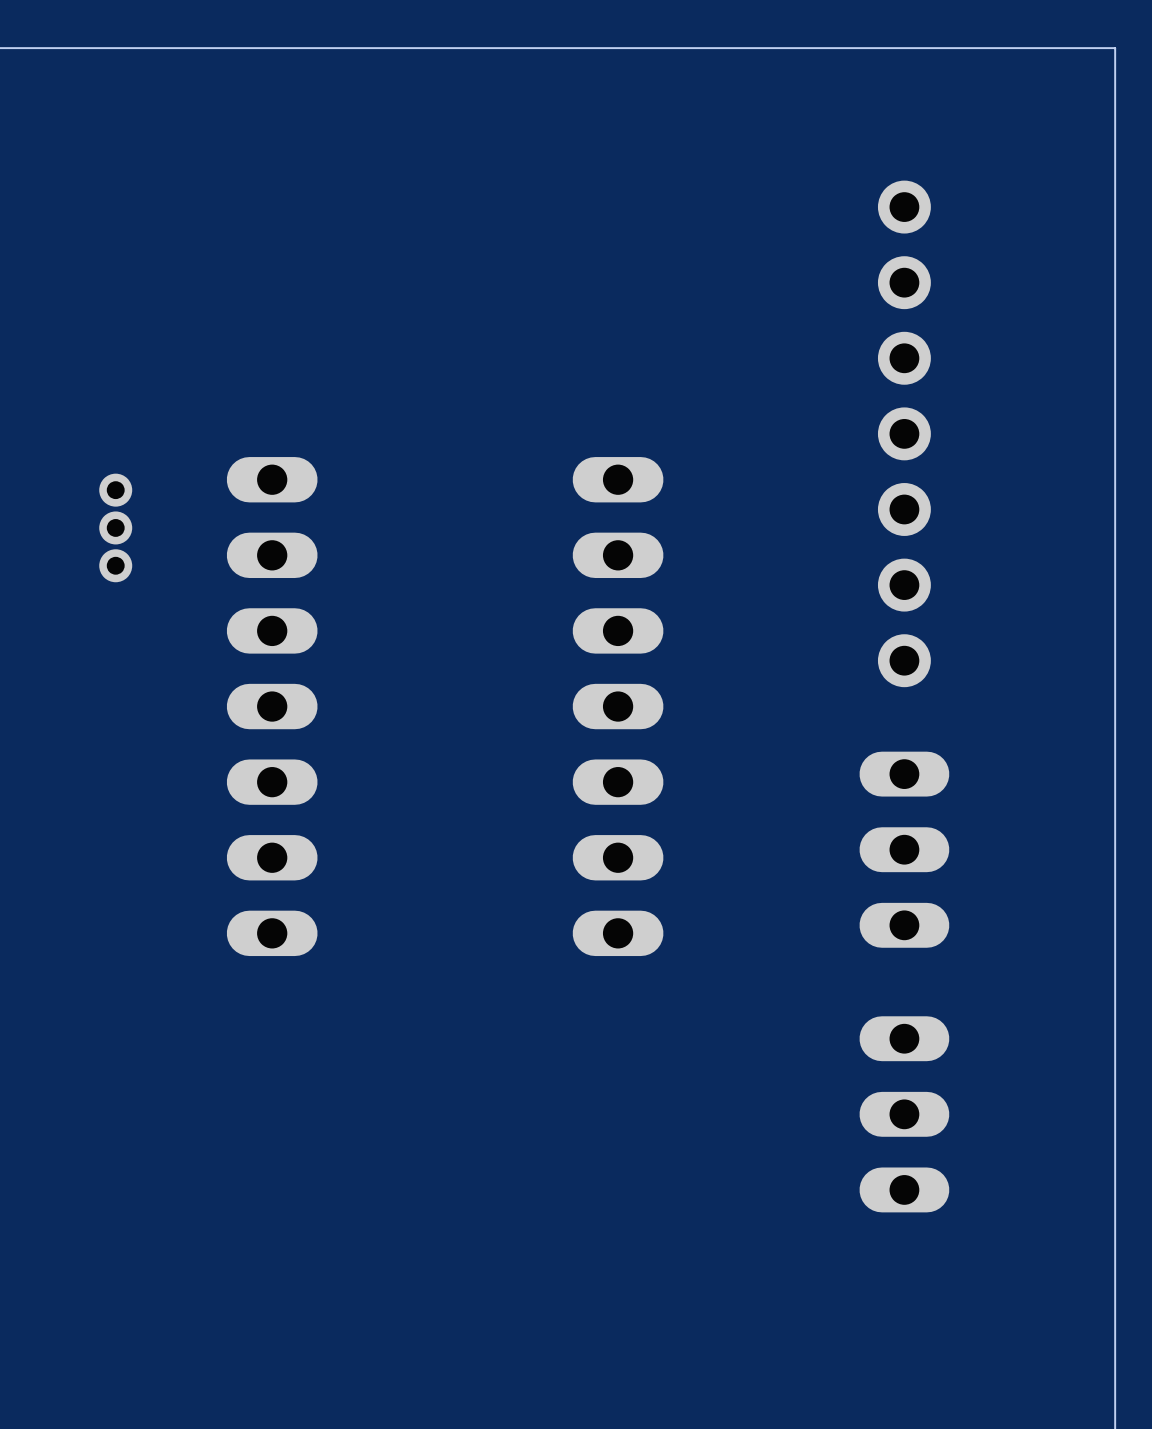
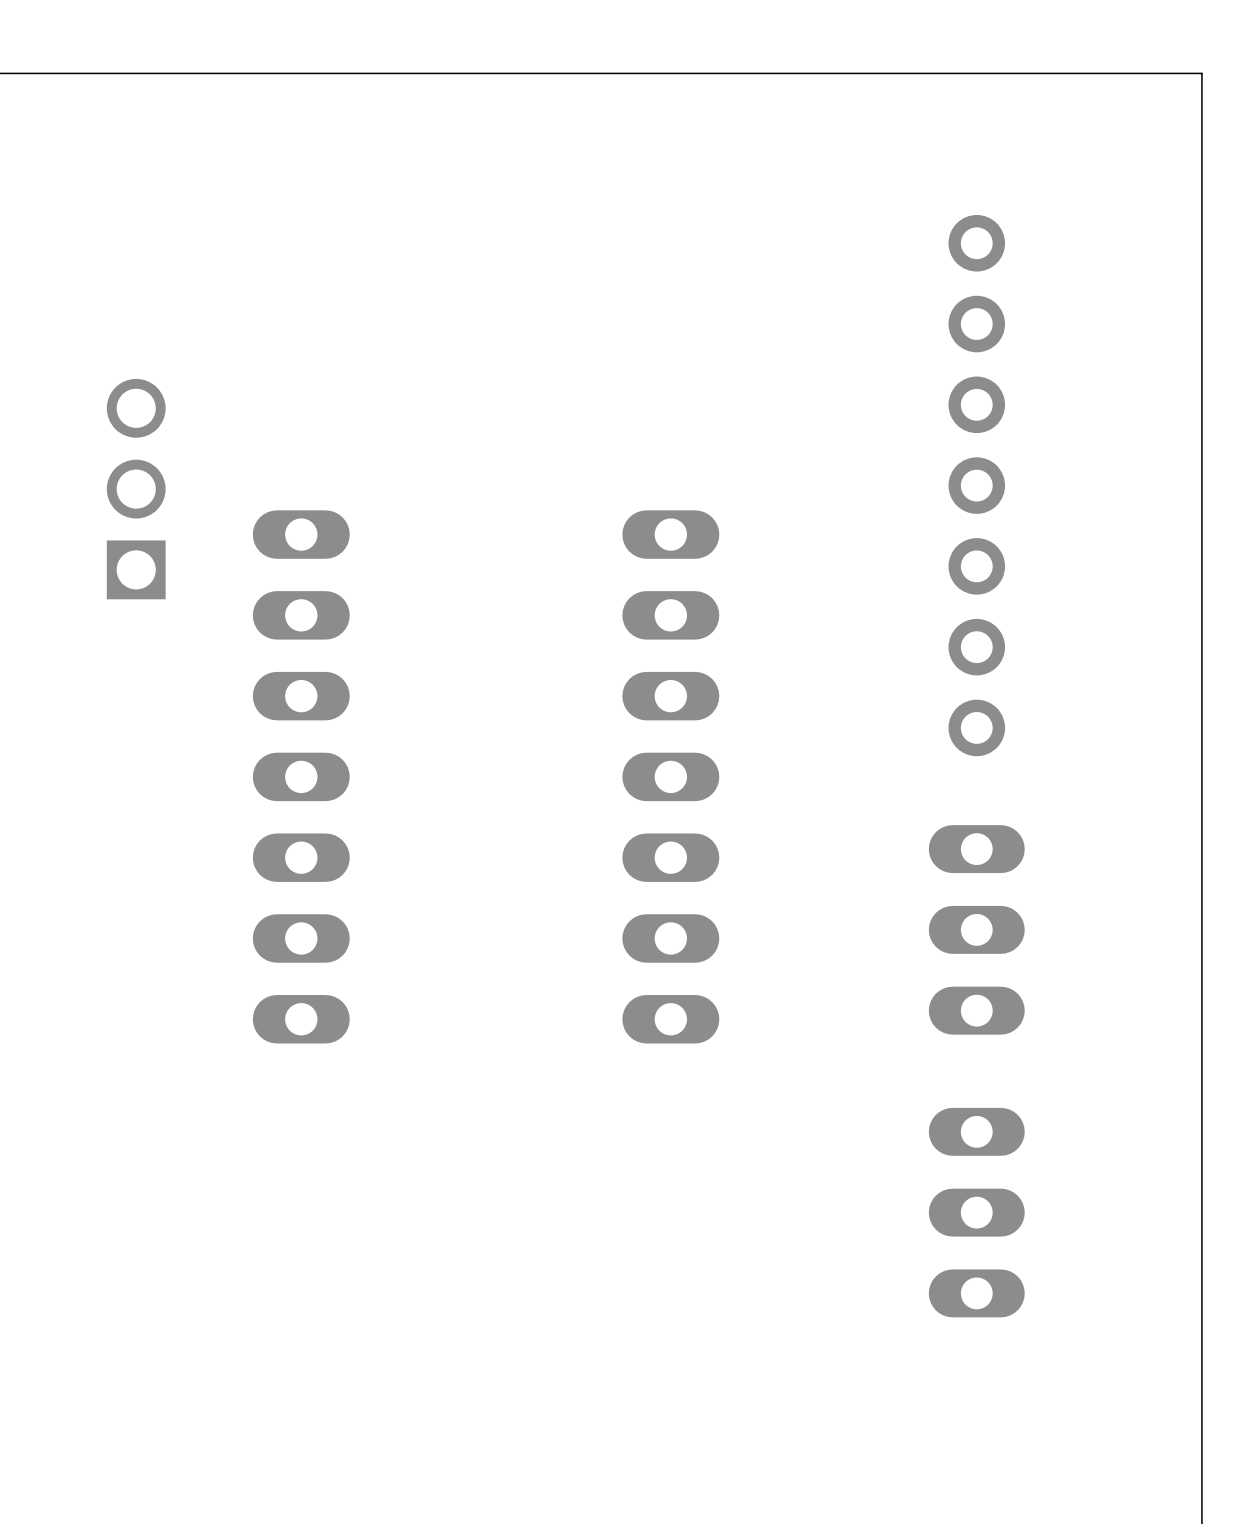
part: none -> (136, 489)
part: (115, 527) -> none

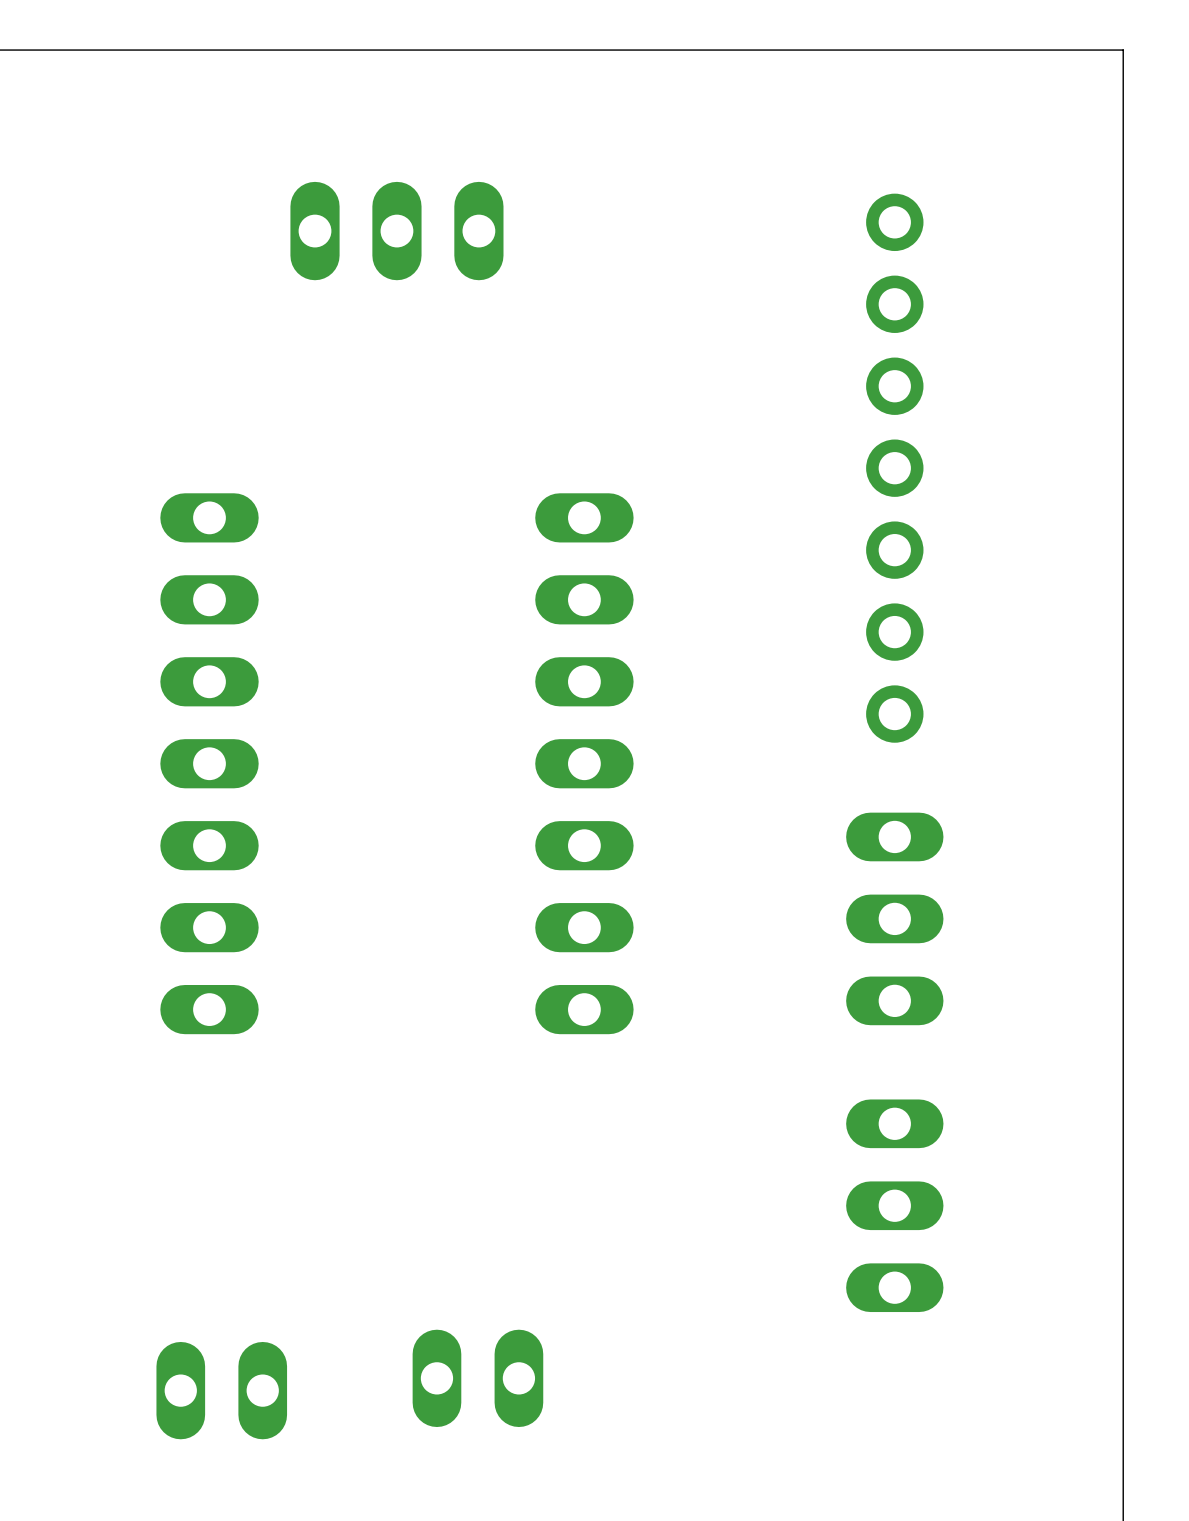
part: none -> (396, 231)
part: (136, 489) -> none
part: none -> (477, 1378)
part: none -> (221, 1390)

